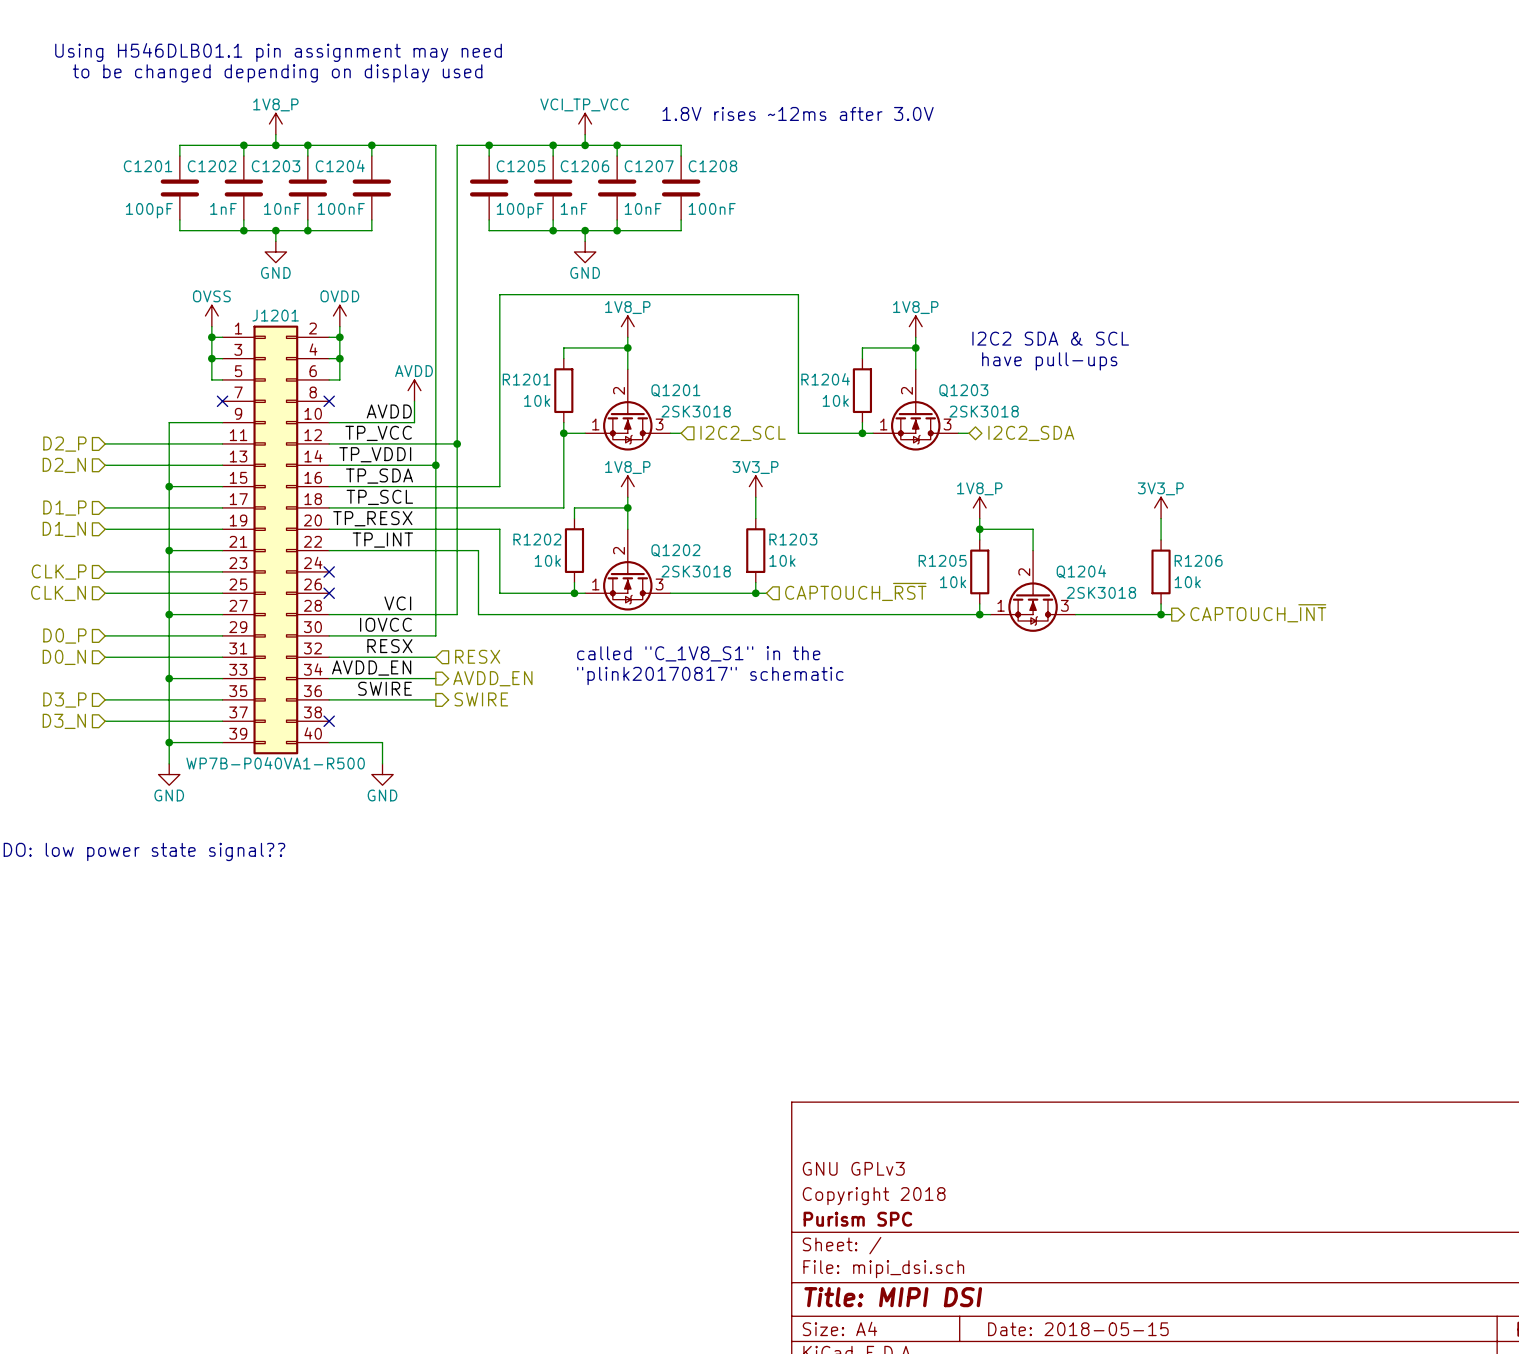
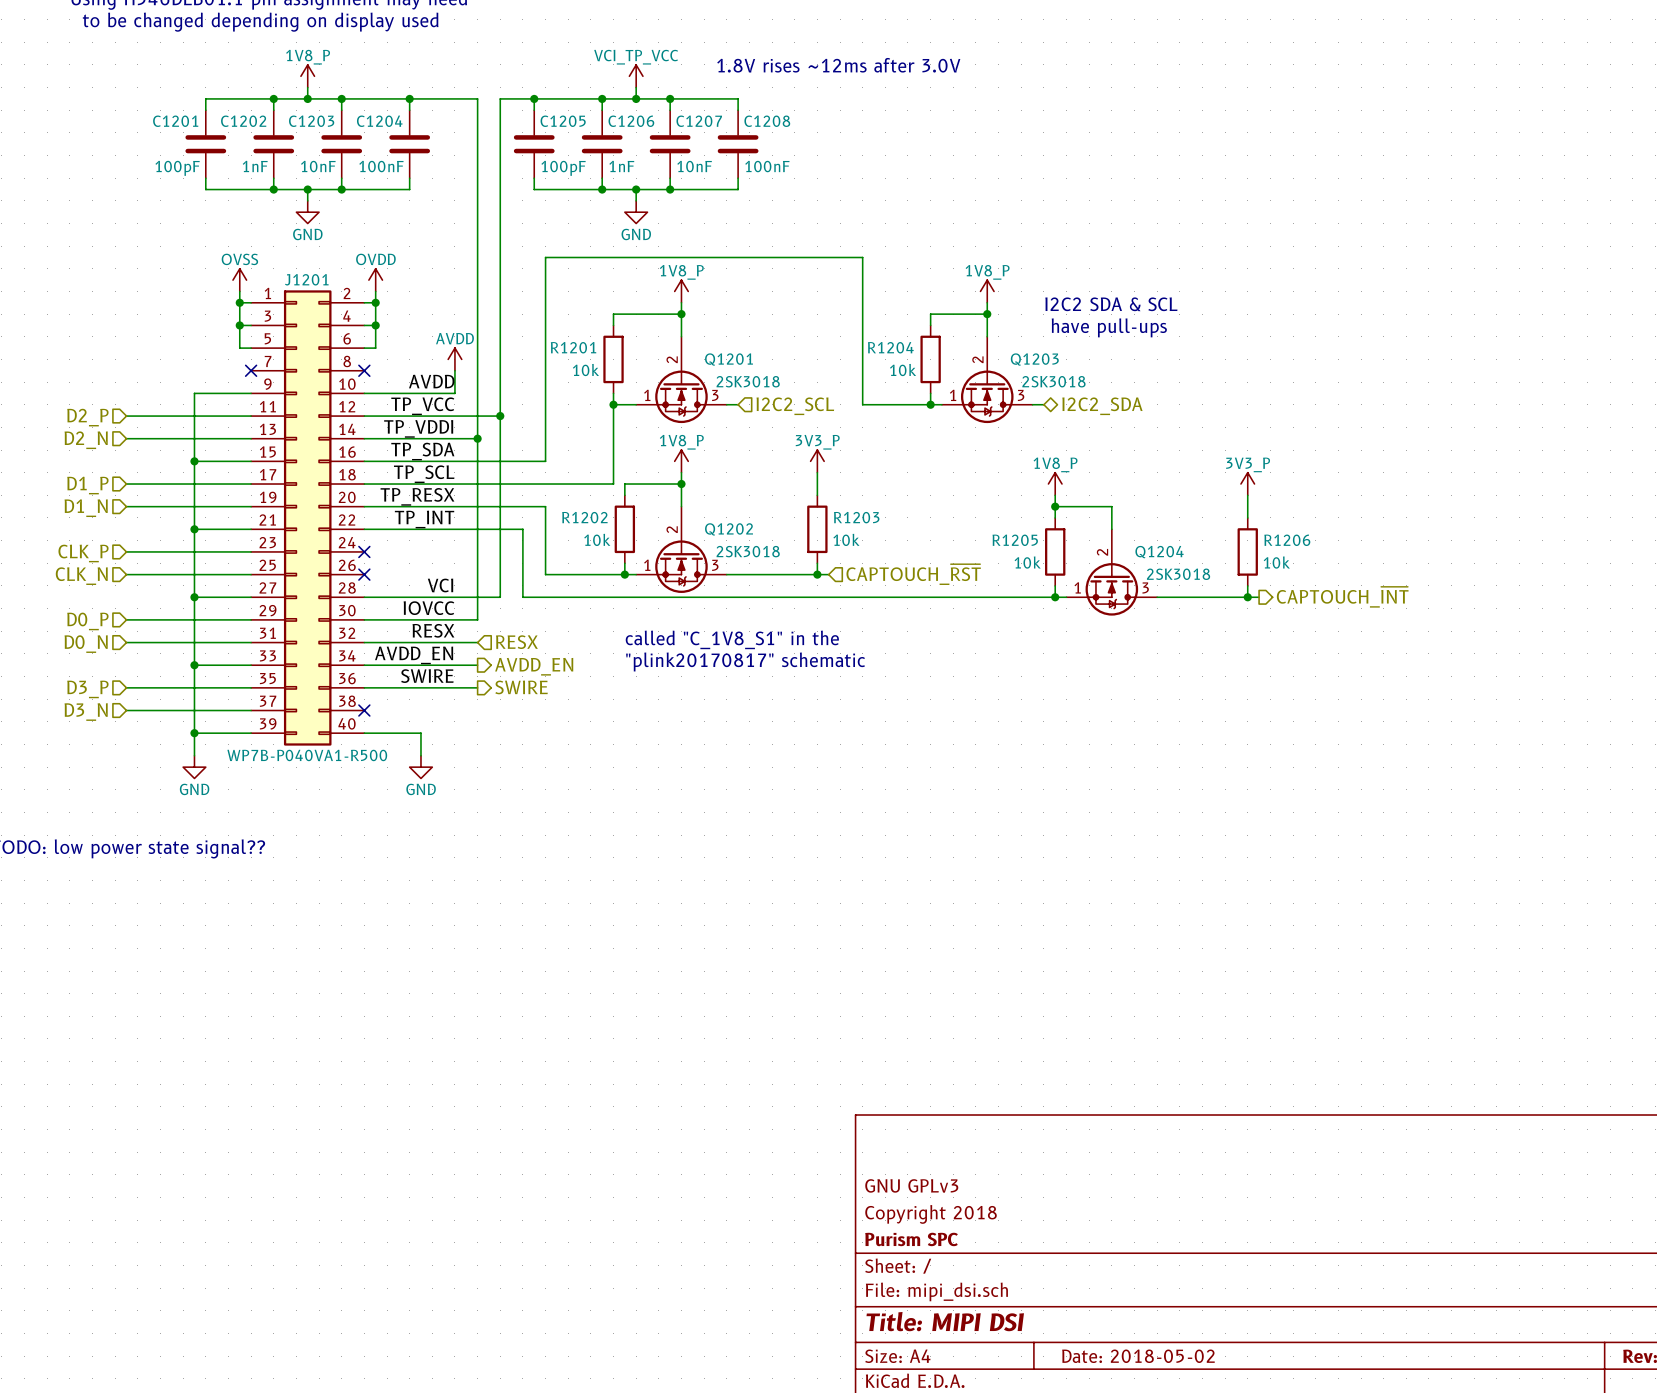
title block: Date: 2018-05-15 (1078, 1329) -> Date: 2018-05-02 (1138, 1356)

